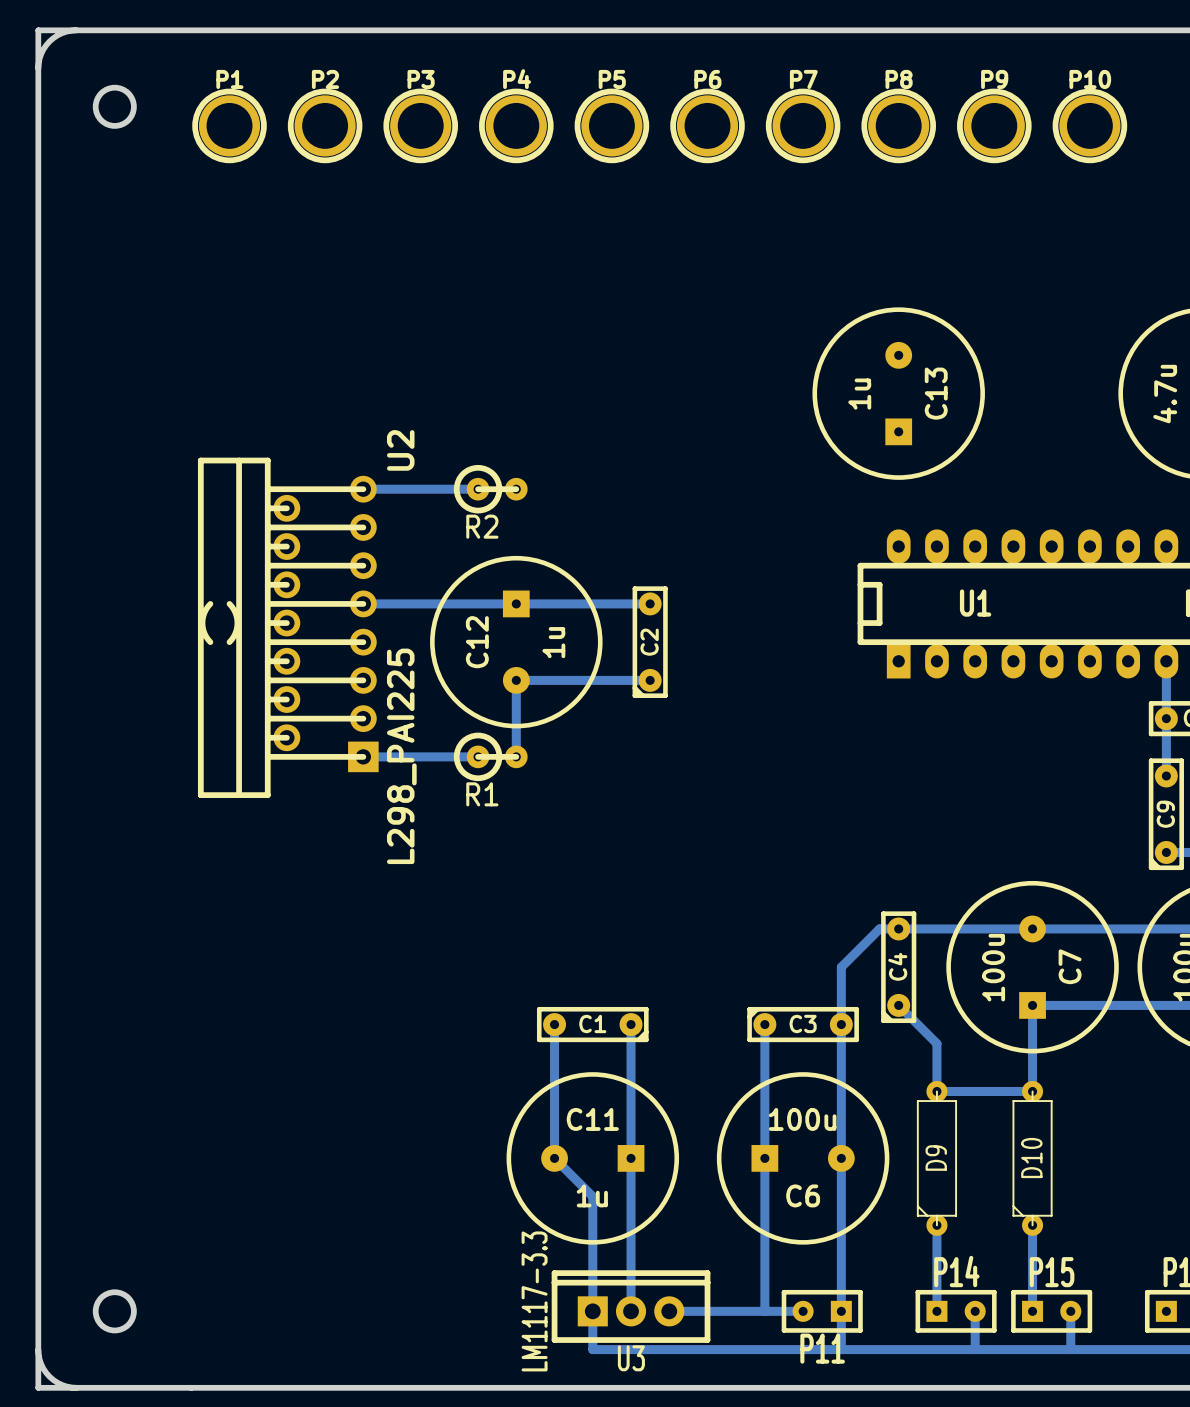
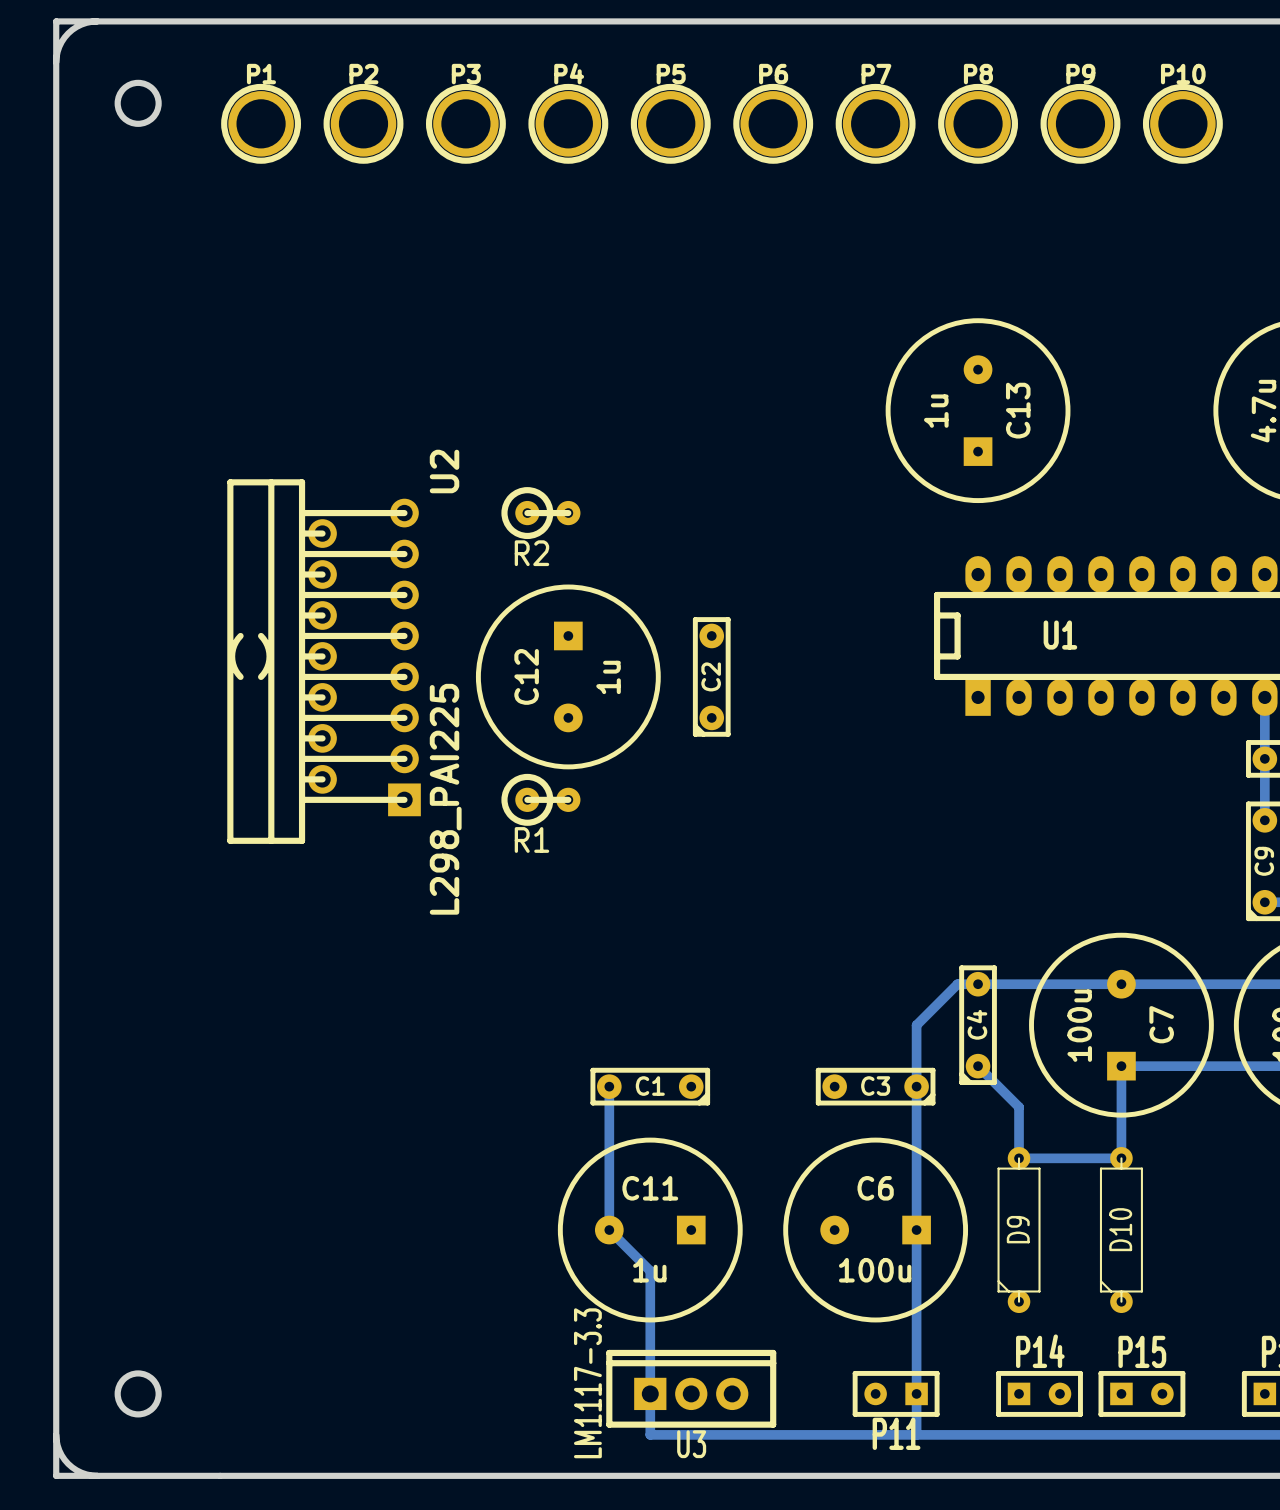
bottom track: (363, 489) (478, 489) -> none
bottom track: (363, 603) (650, 603) -> none
bottom track: (650, 680) (516, 680) (516, 756) -> none
bottom track: (363, 756) (478, 756) -> none
bottom track: (631, 1024) (631, 1311) -> none
bottom track: (764, 1024) (764, 1311) -> none
C3 rotation: 0° (803, 1024) -> 180° (875, 1086)
C6 rotation: 0° (803, 1158) -> 180° (875, 1230)
bottom track: (936, 1225) (936, 1311) -> none
bottom track: (1032, 1225) (1032, 1311) -> none
bottom track: (669, 1311) (803, 1311) -> none
bottom track: (975, 1311) (975, 1349) -> none
bottom track: (1070, 1311) (1070, 1349) -> none

